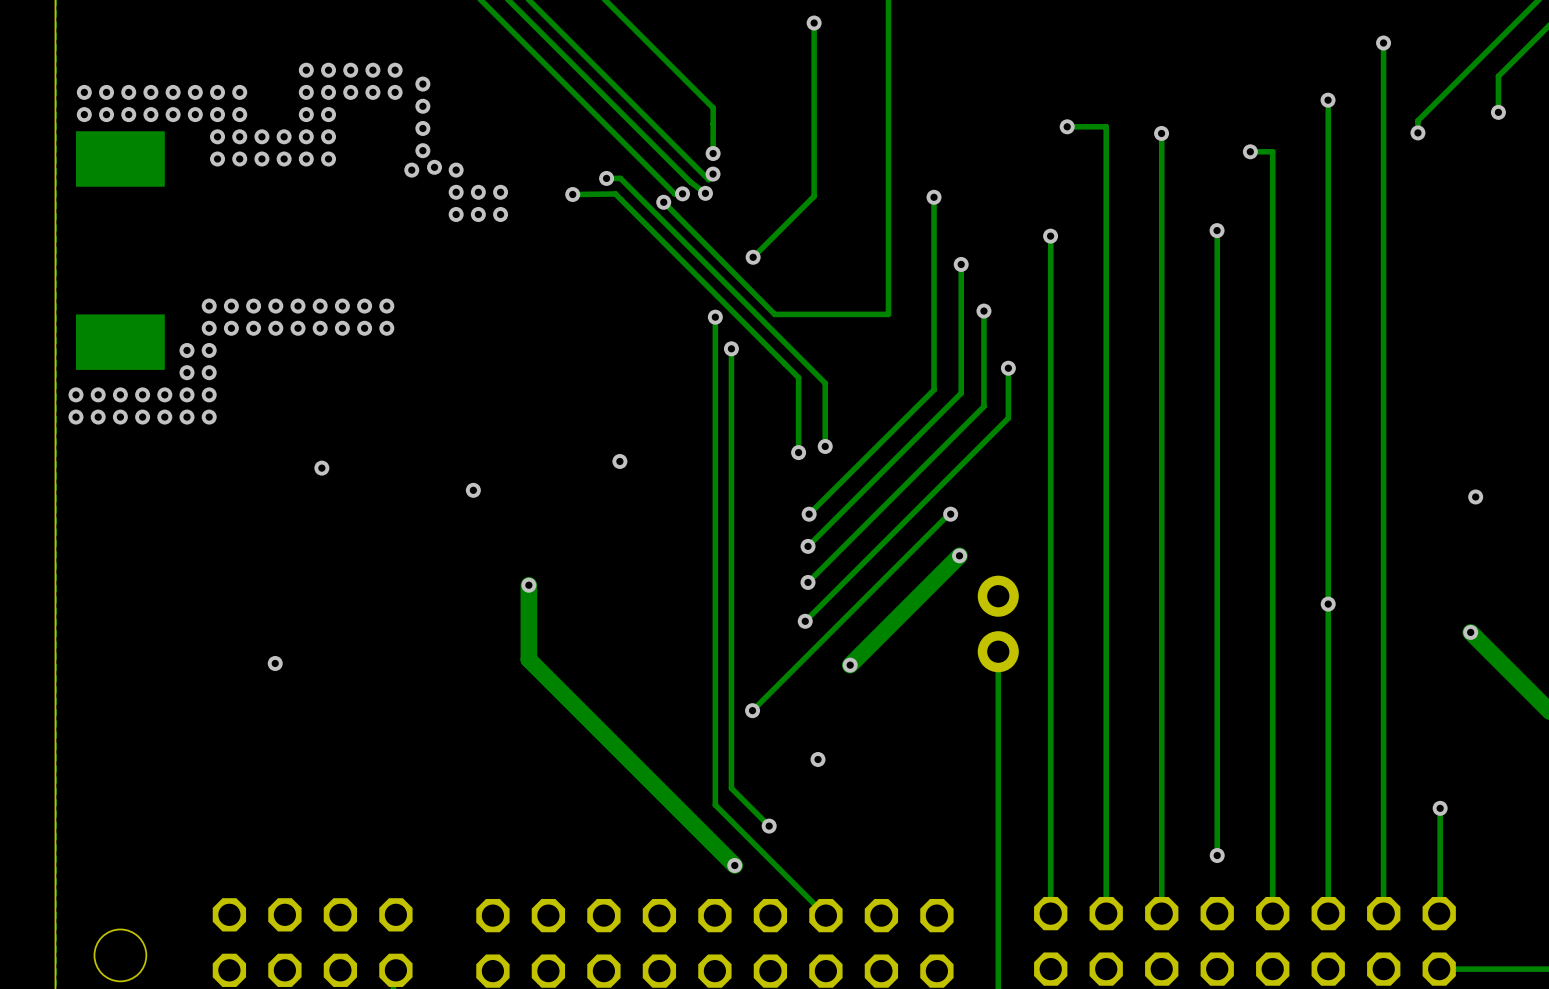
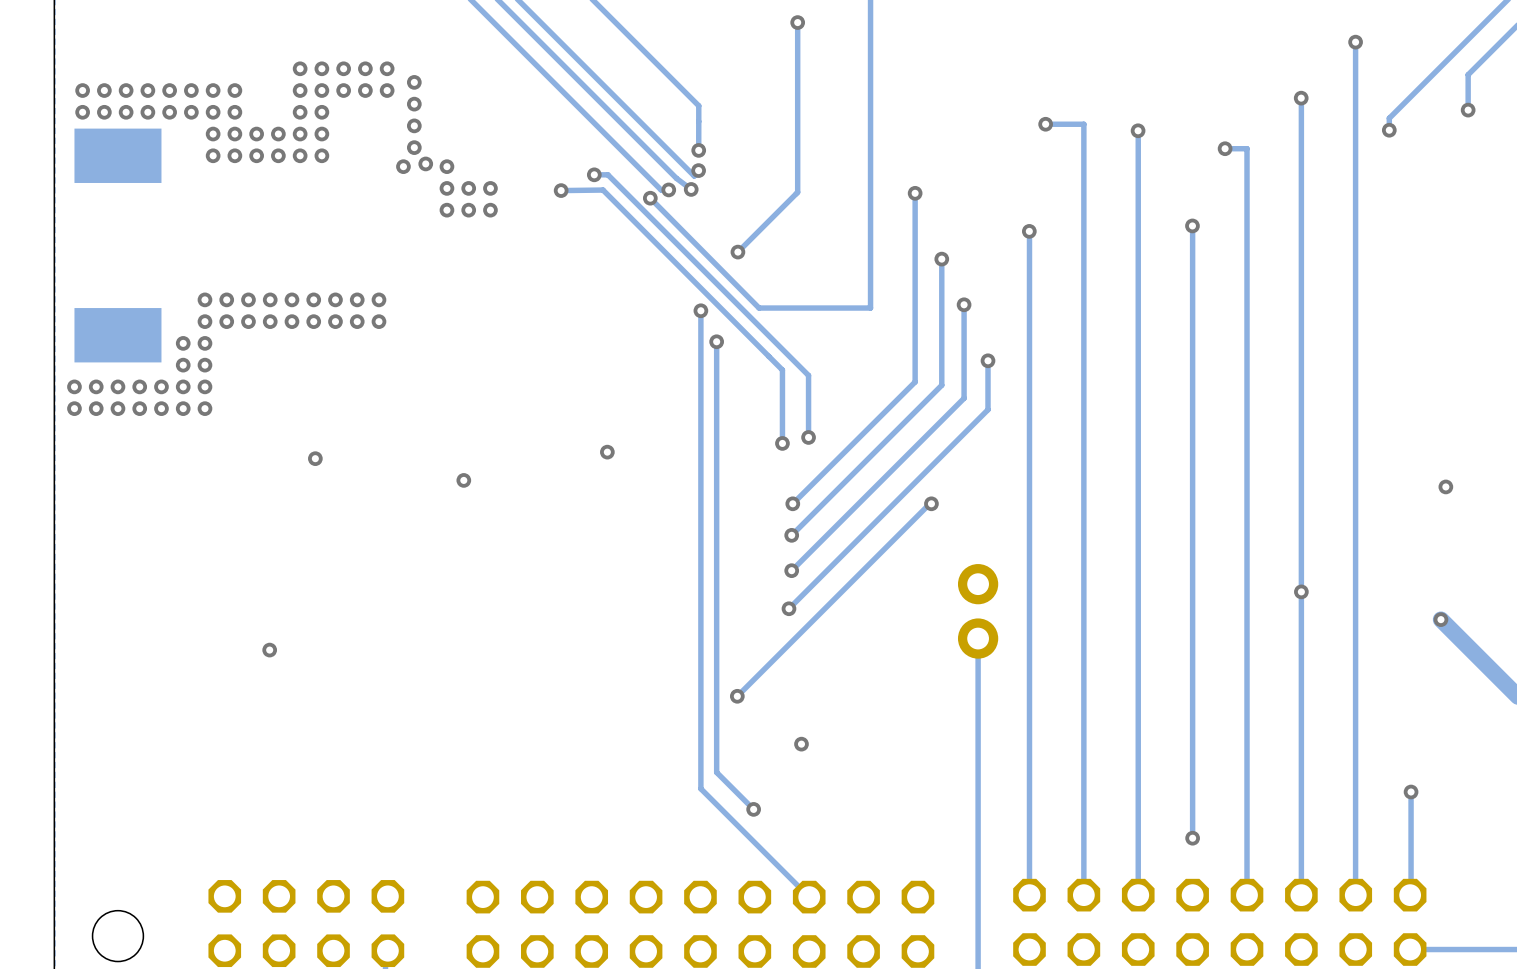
track: (959, 555) (850, 665) -> none
via: (959, 555) -> none
track: (528, 585) (528, 659) (734, 865) -> none
via: (528, 585) -> none
via: (850, 665) -> none
via: (734, 865) -> none

